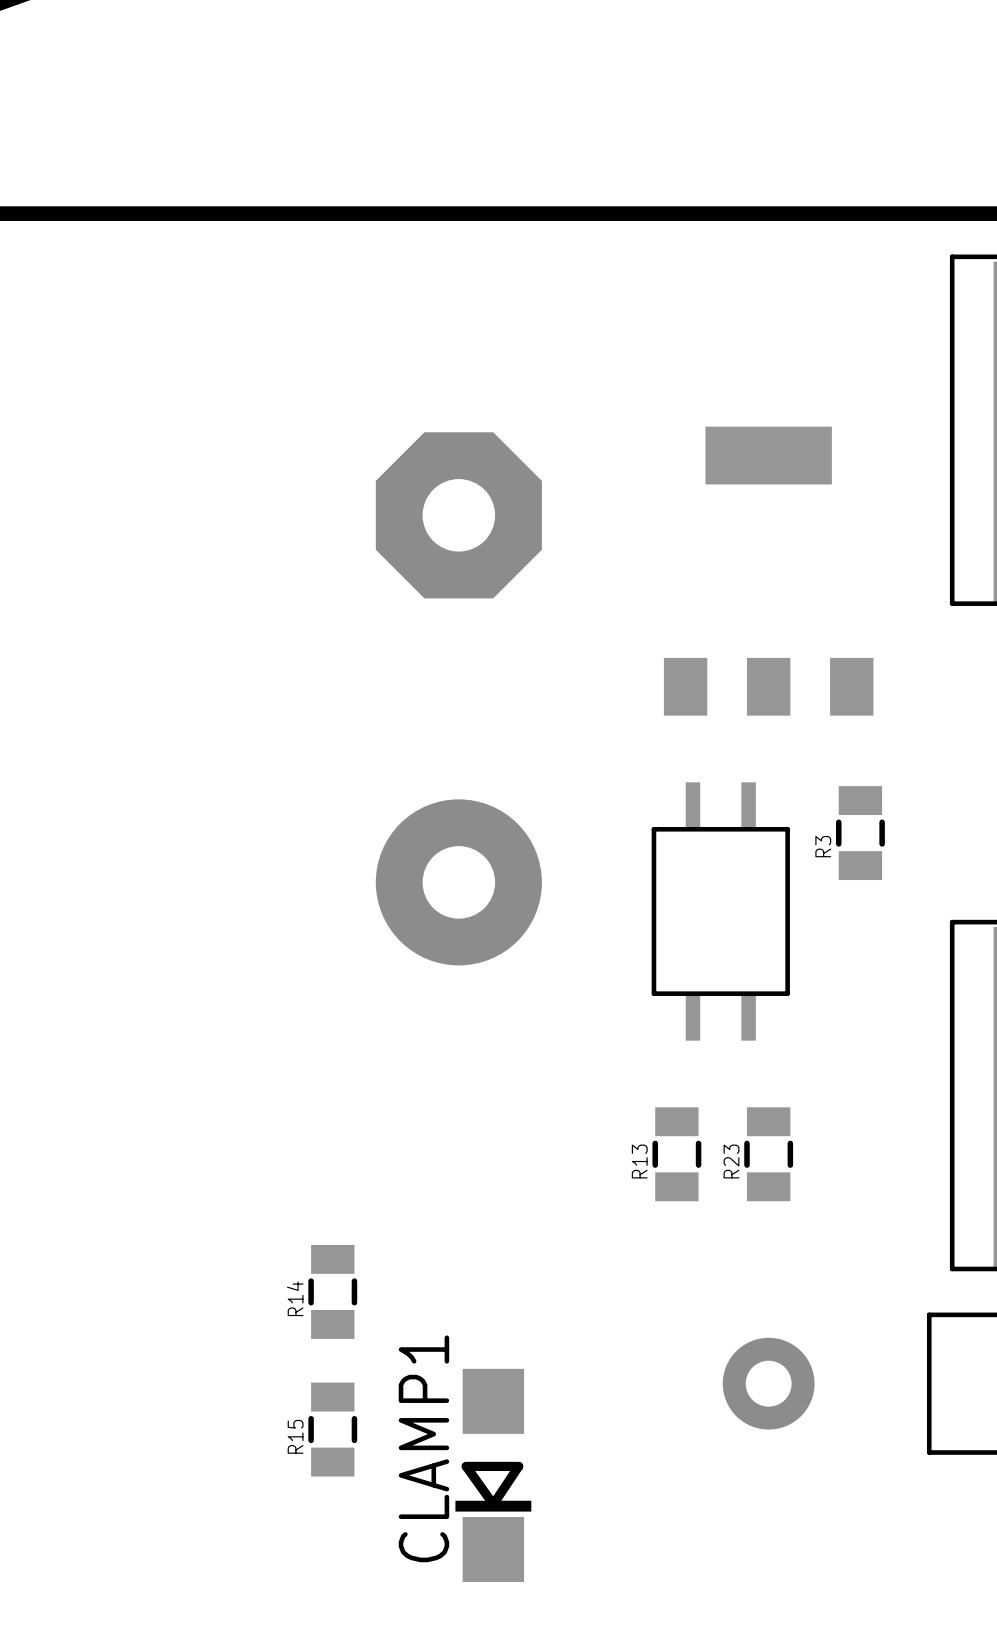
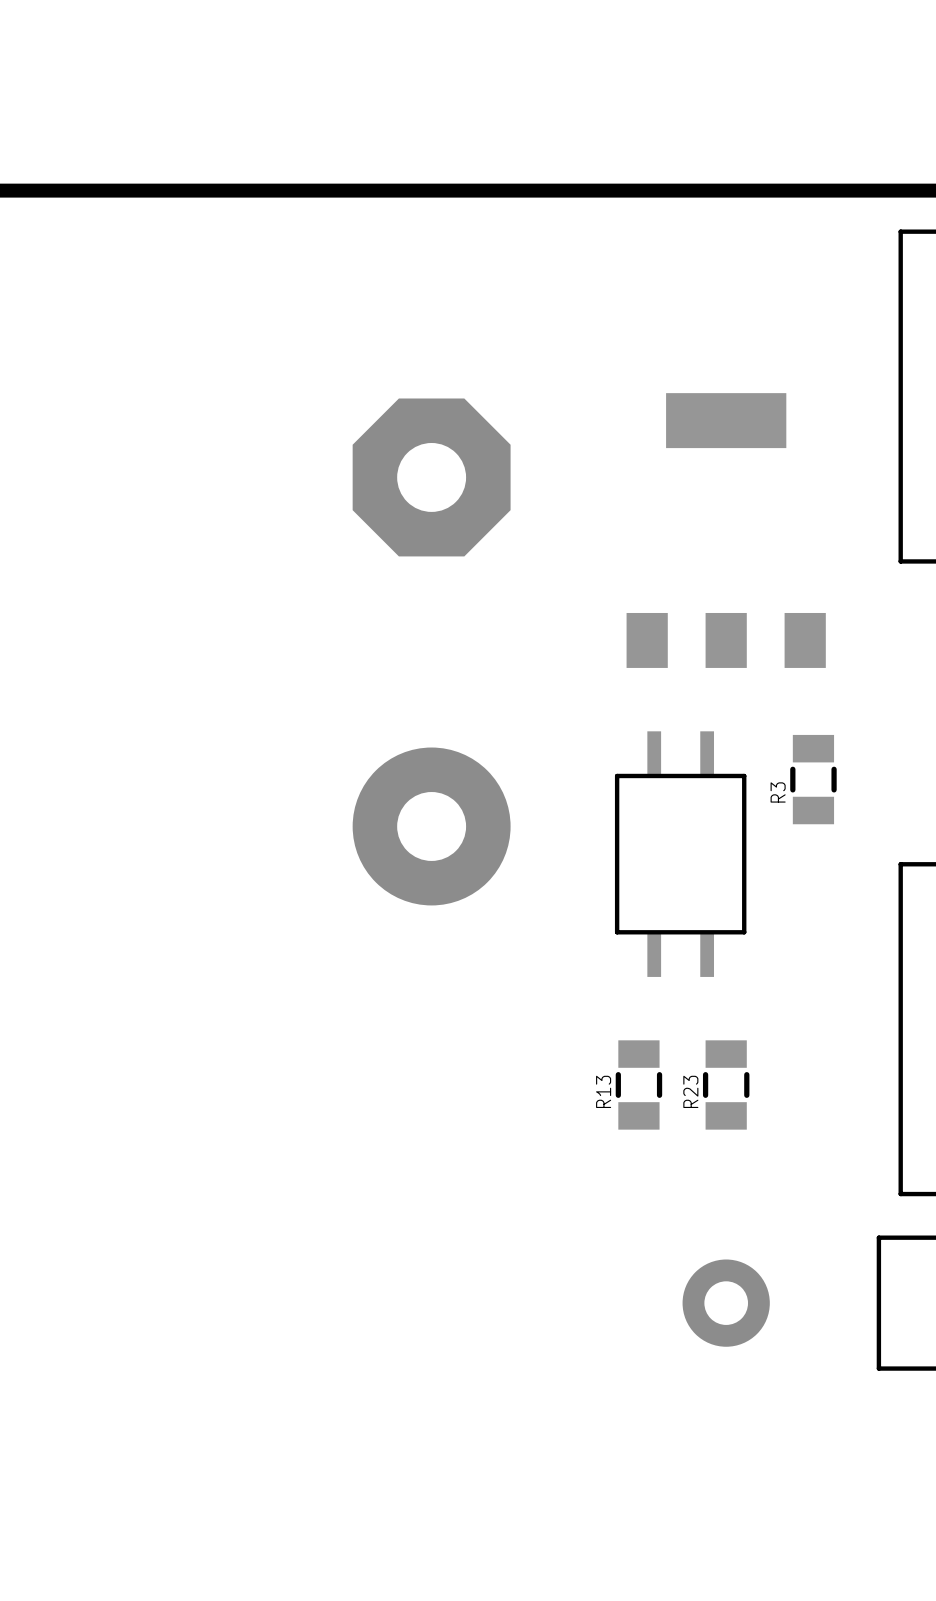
R14: (332, 1291) -> none
R15: (332, 1429) -> none
CLAMP1: (493, 1475) -> none

